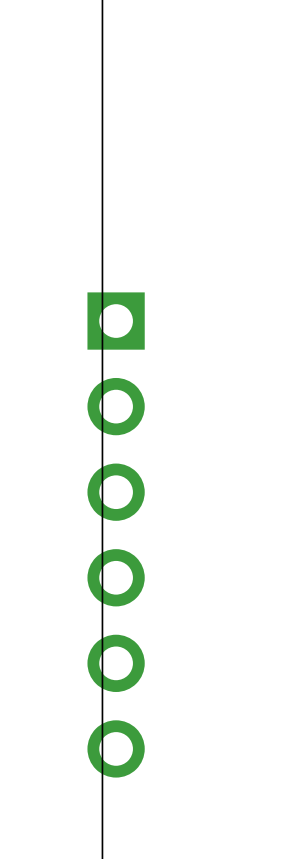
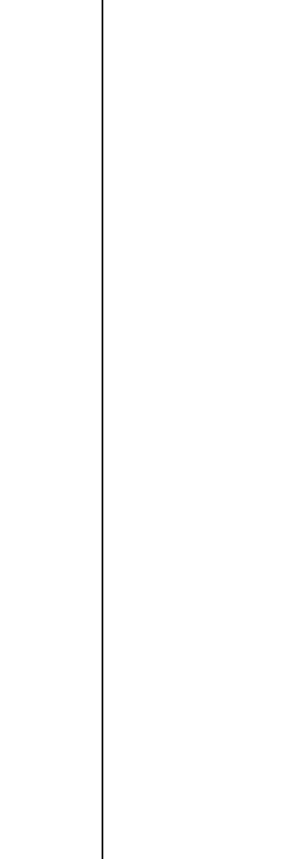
part: (116, 534) -> none

